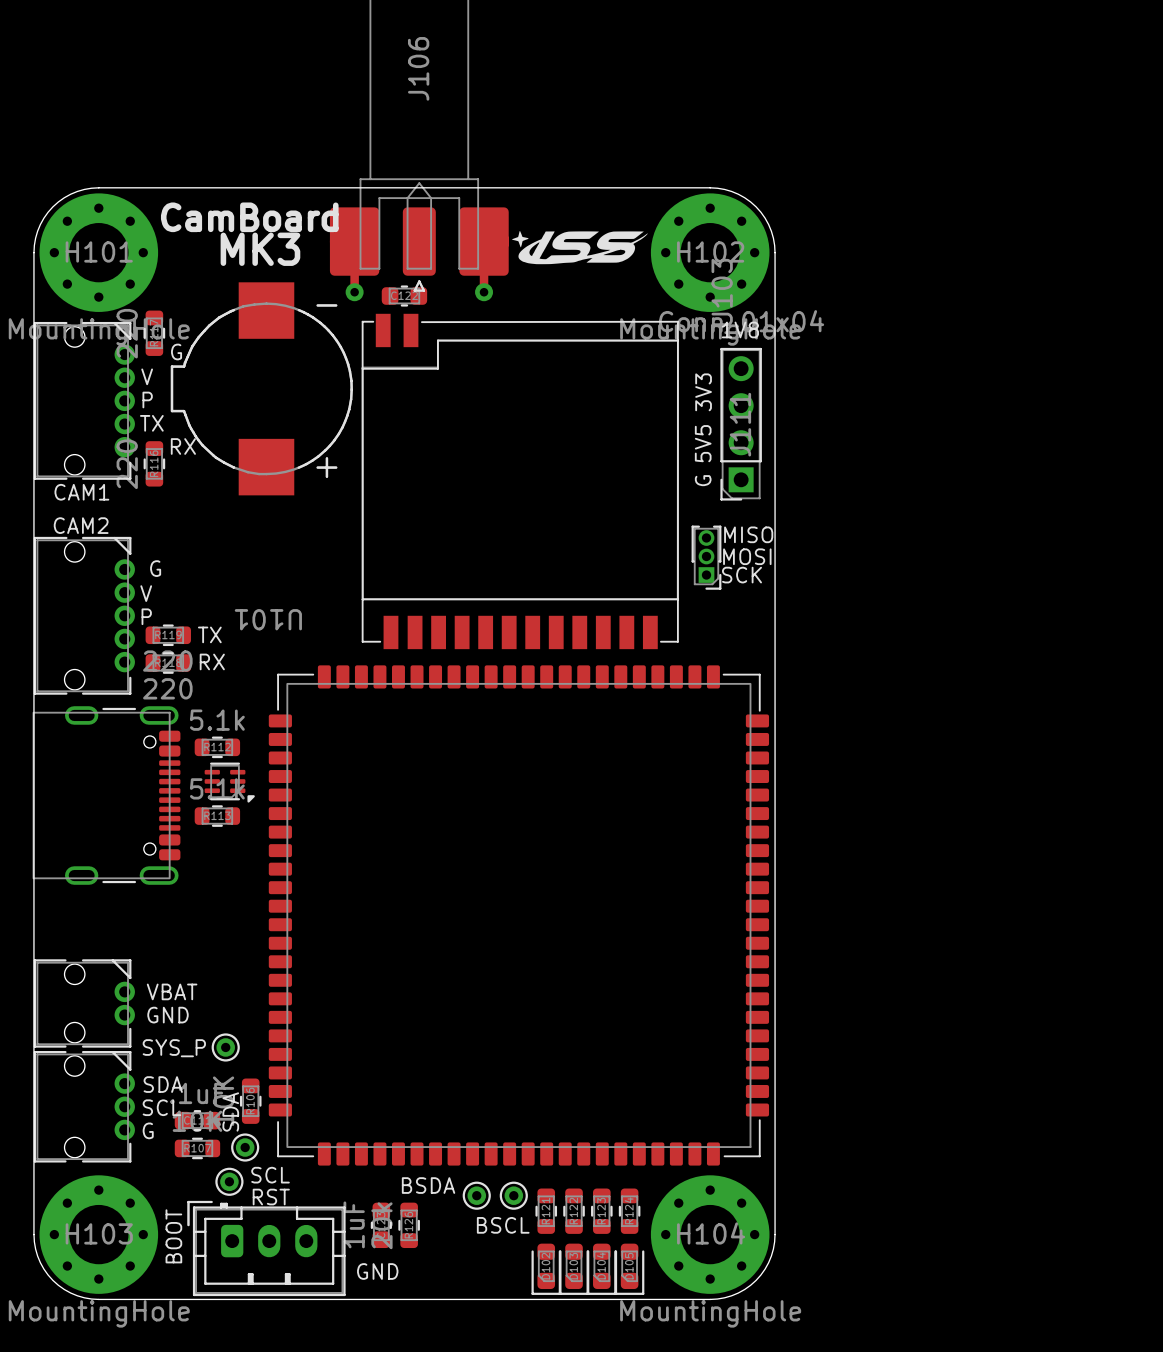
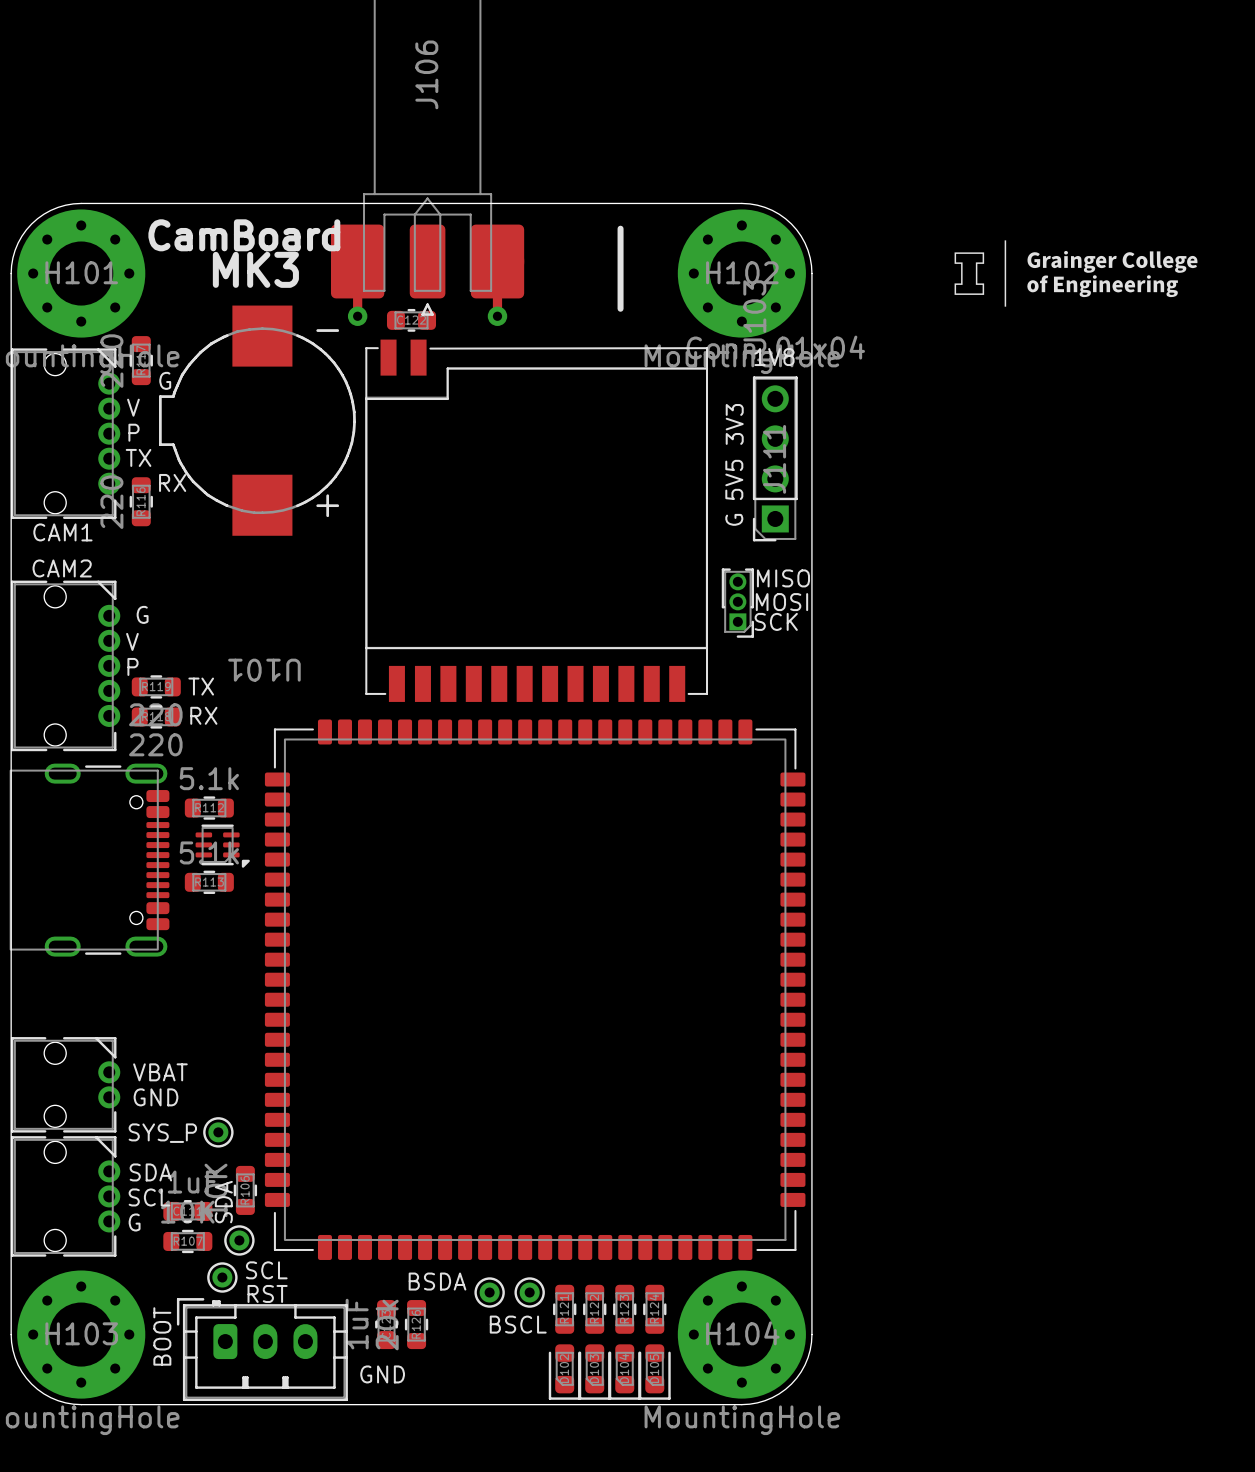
drawing: none -> [954, 240, 1198, 307]
drawing: [512, 230, 648, 265] -> none
text: none -> I (620, 268)

